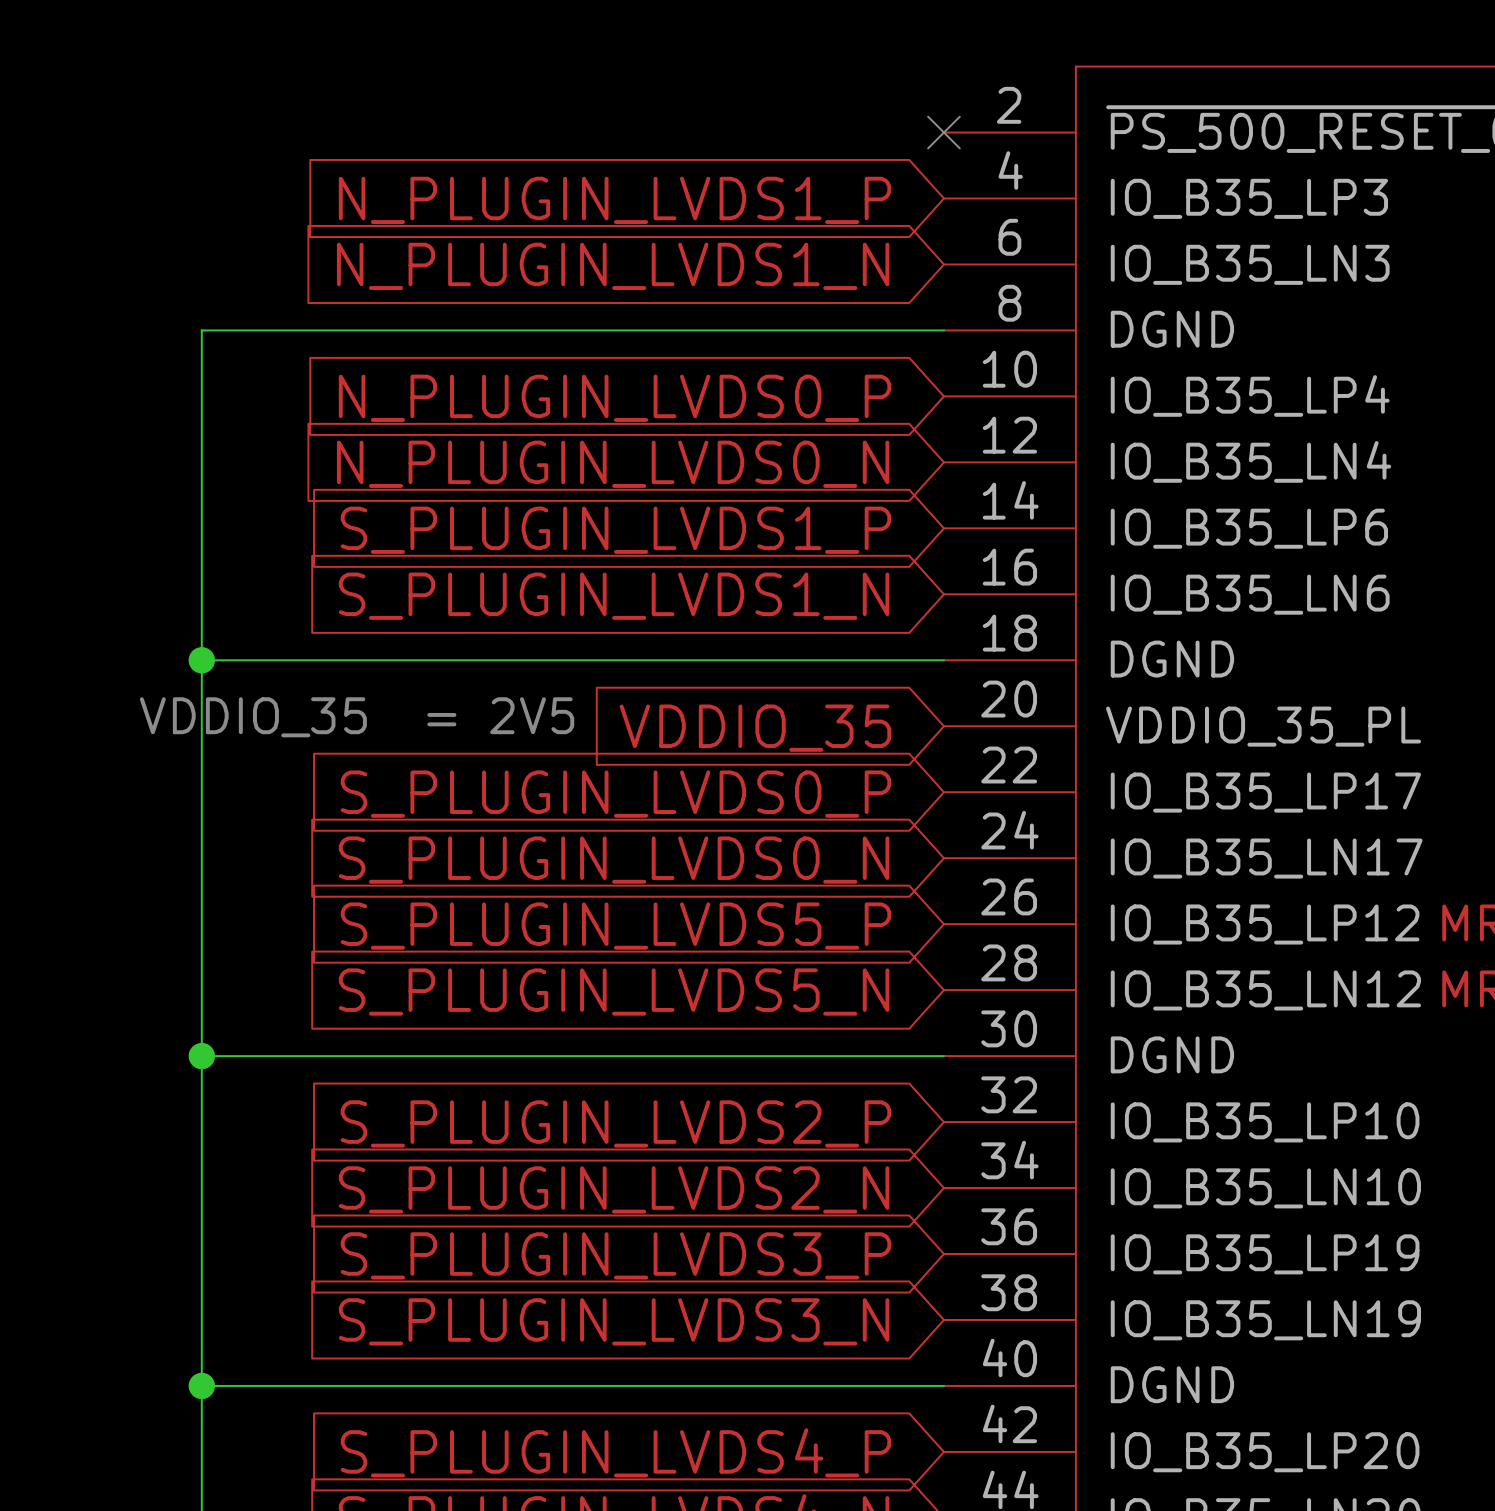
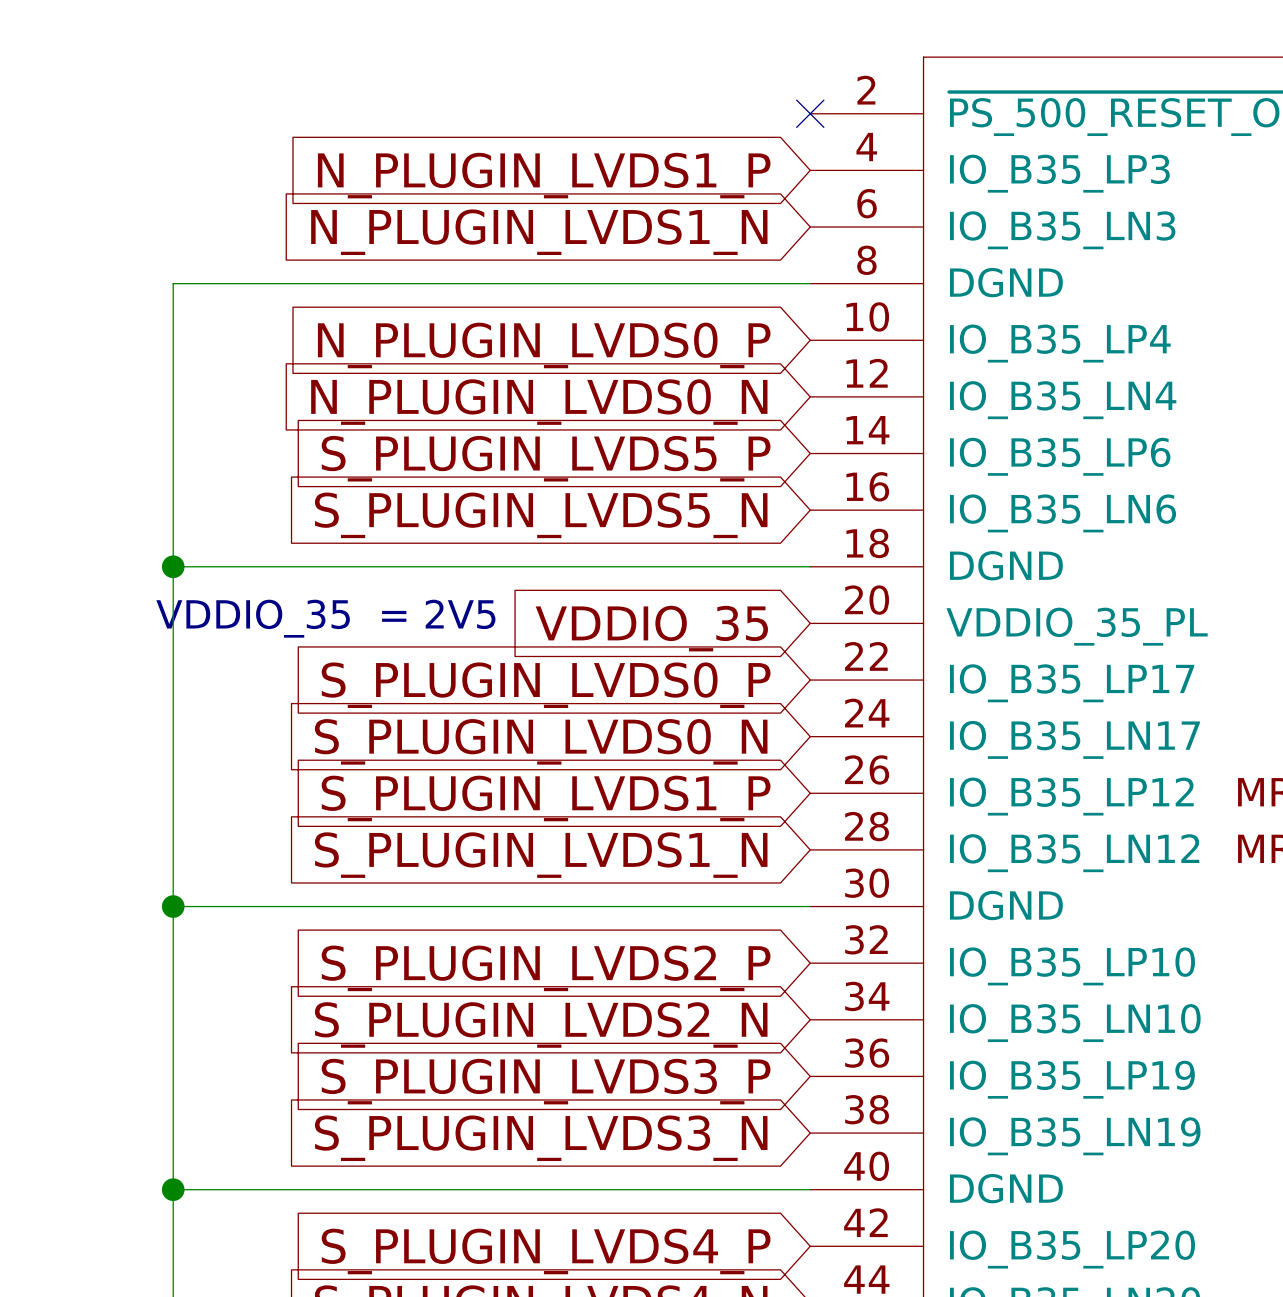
global label: S_PLUGIN_LVDS1_P (615, 530) -> S_PLUGIN_LVDS5_P (546, 458)
global label: S_PLUGIN_LVDS1_N (614, 596) -> S_PLUGIN_LVDS5_N (541, 515)
global label: S_PLUGIN_LVDS5_P (615, 926) -> S_PLUGIN_LVDS1_P (546, 798)
global label: S_PLUGIN_LVDS5_N (614, 992) -> S_PLUGIN_LVDS1_N (541, 855)

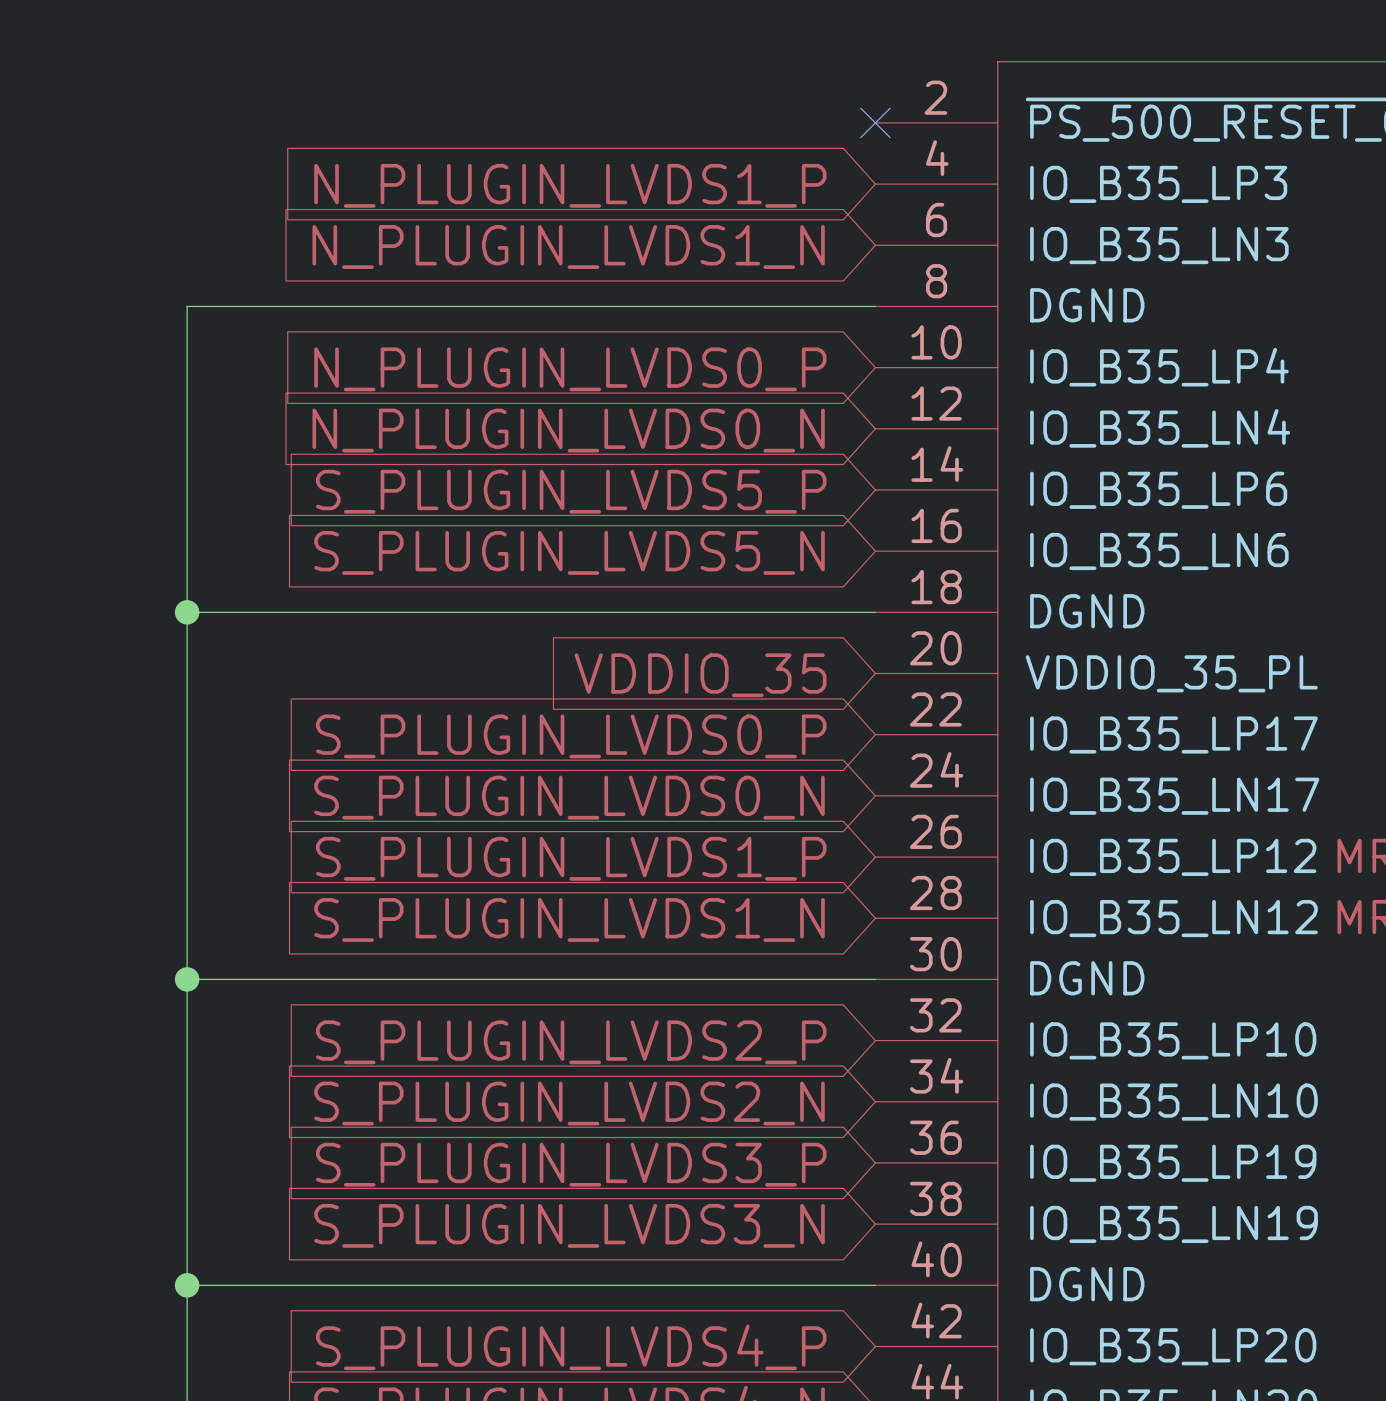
text: VDDIO_35 = 2V5 (325, 618) -> none

